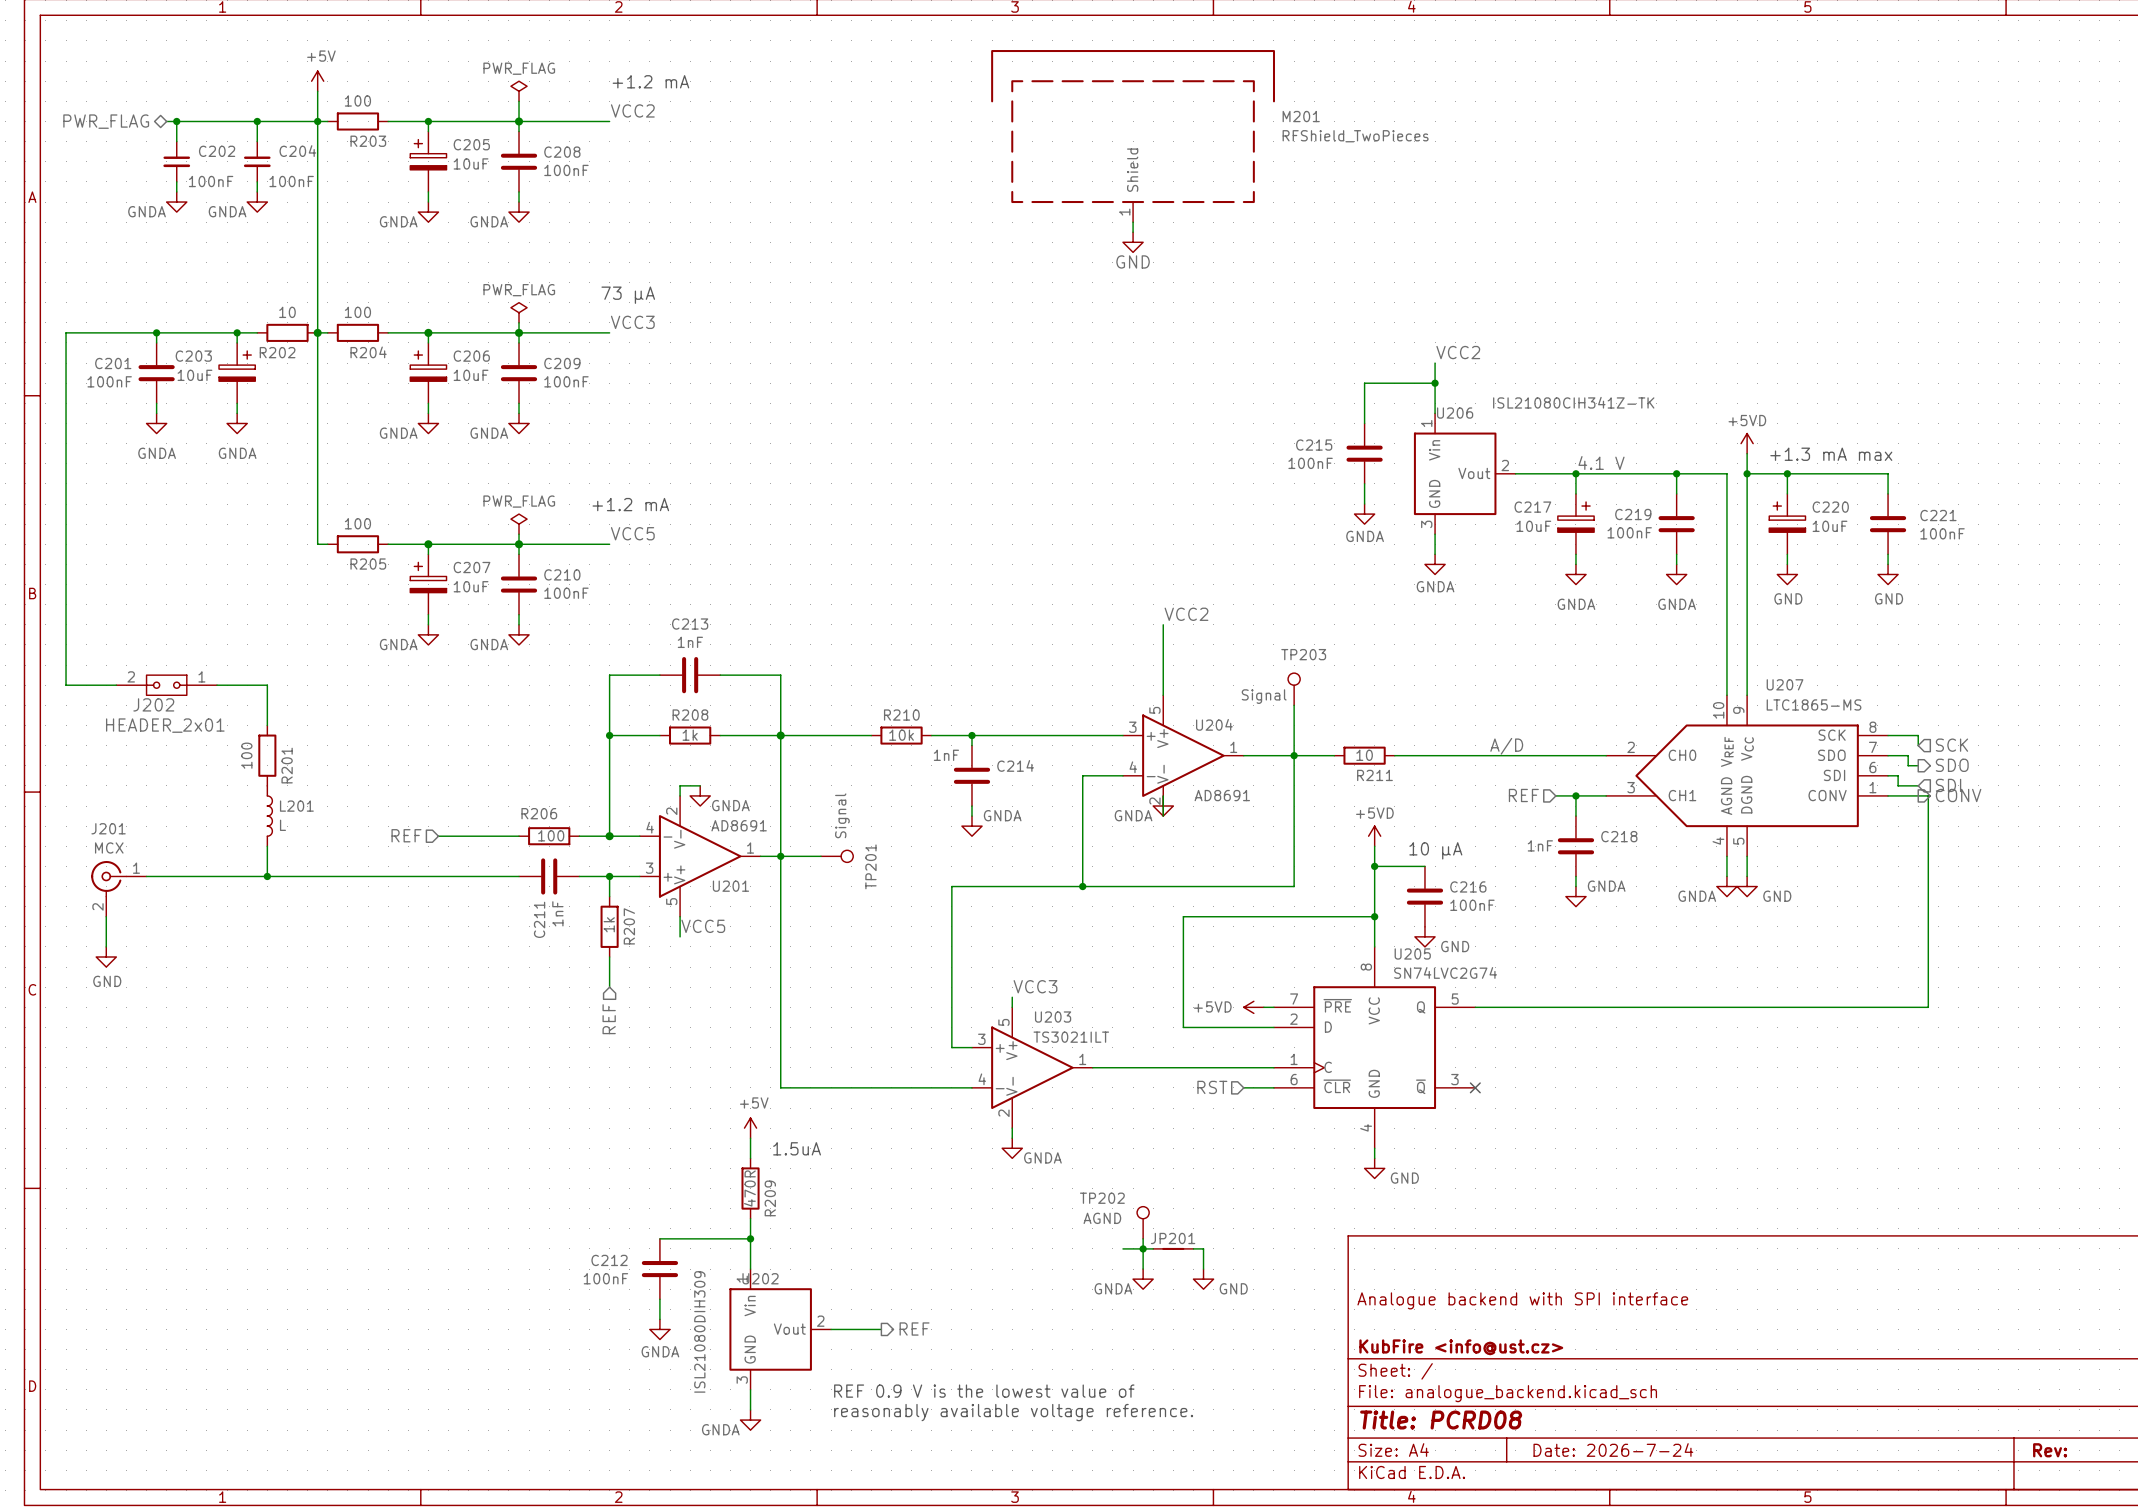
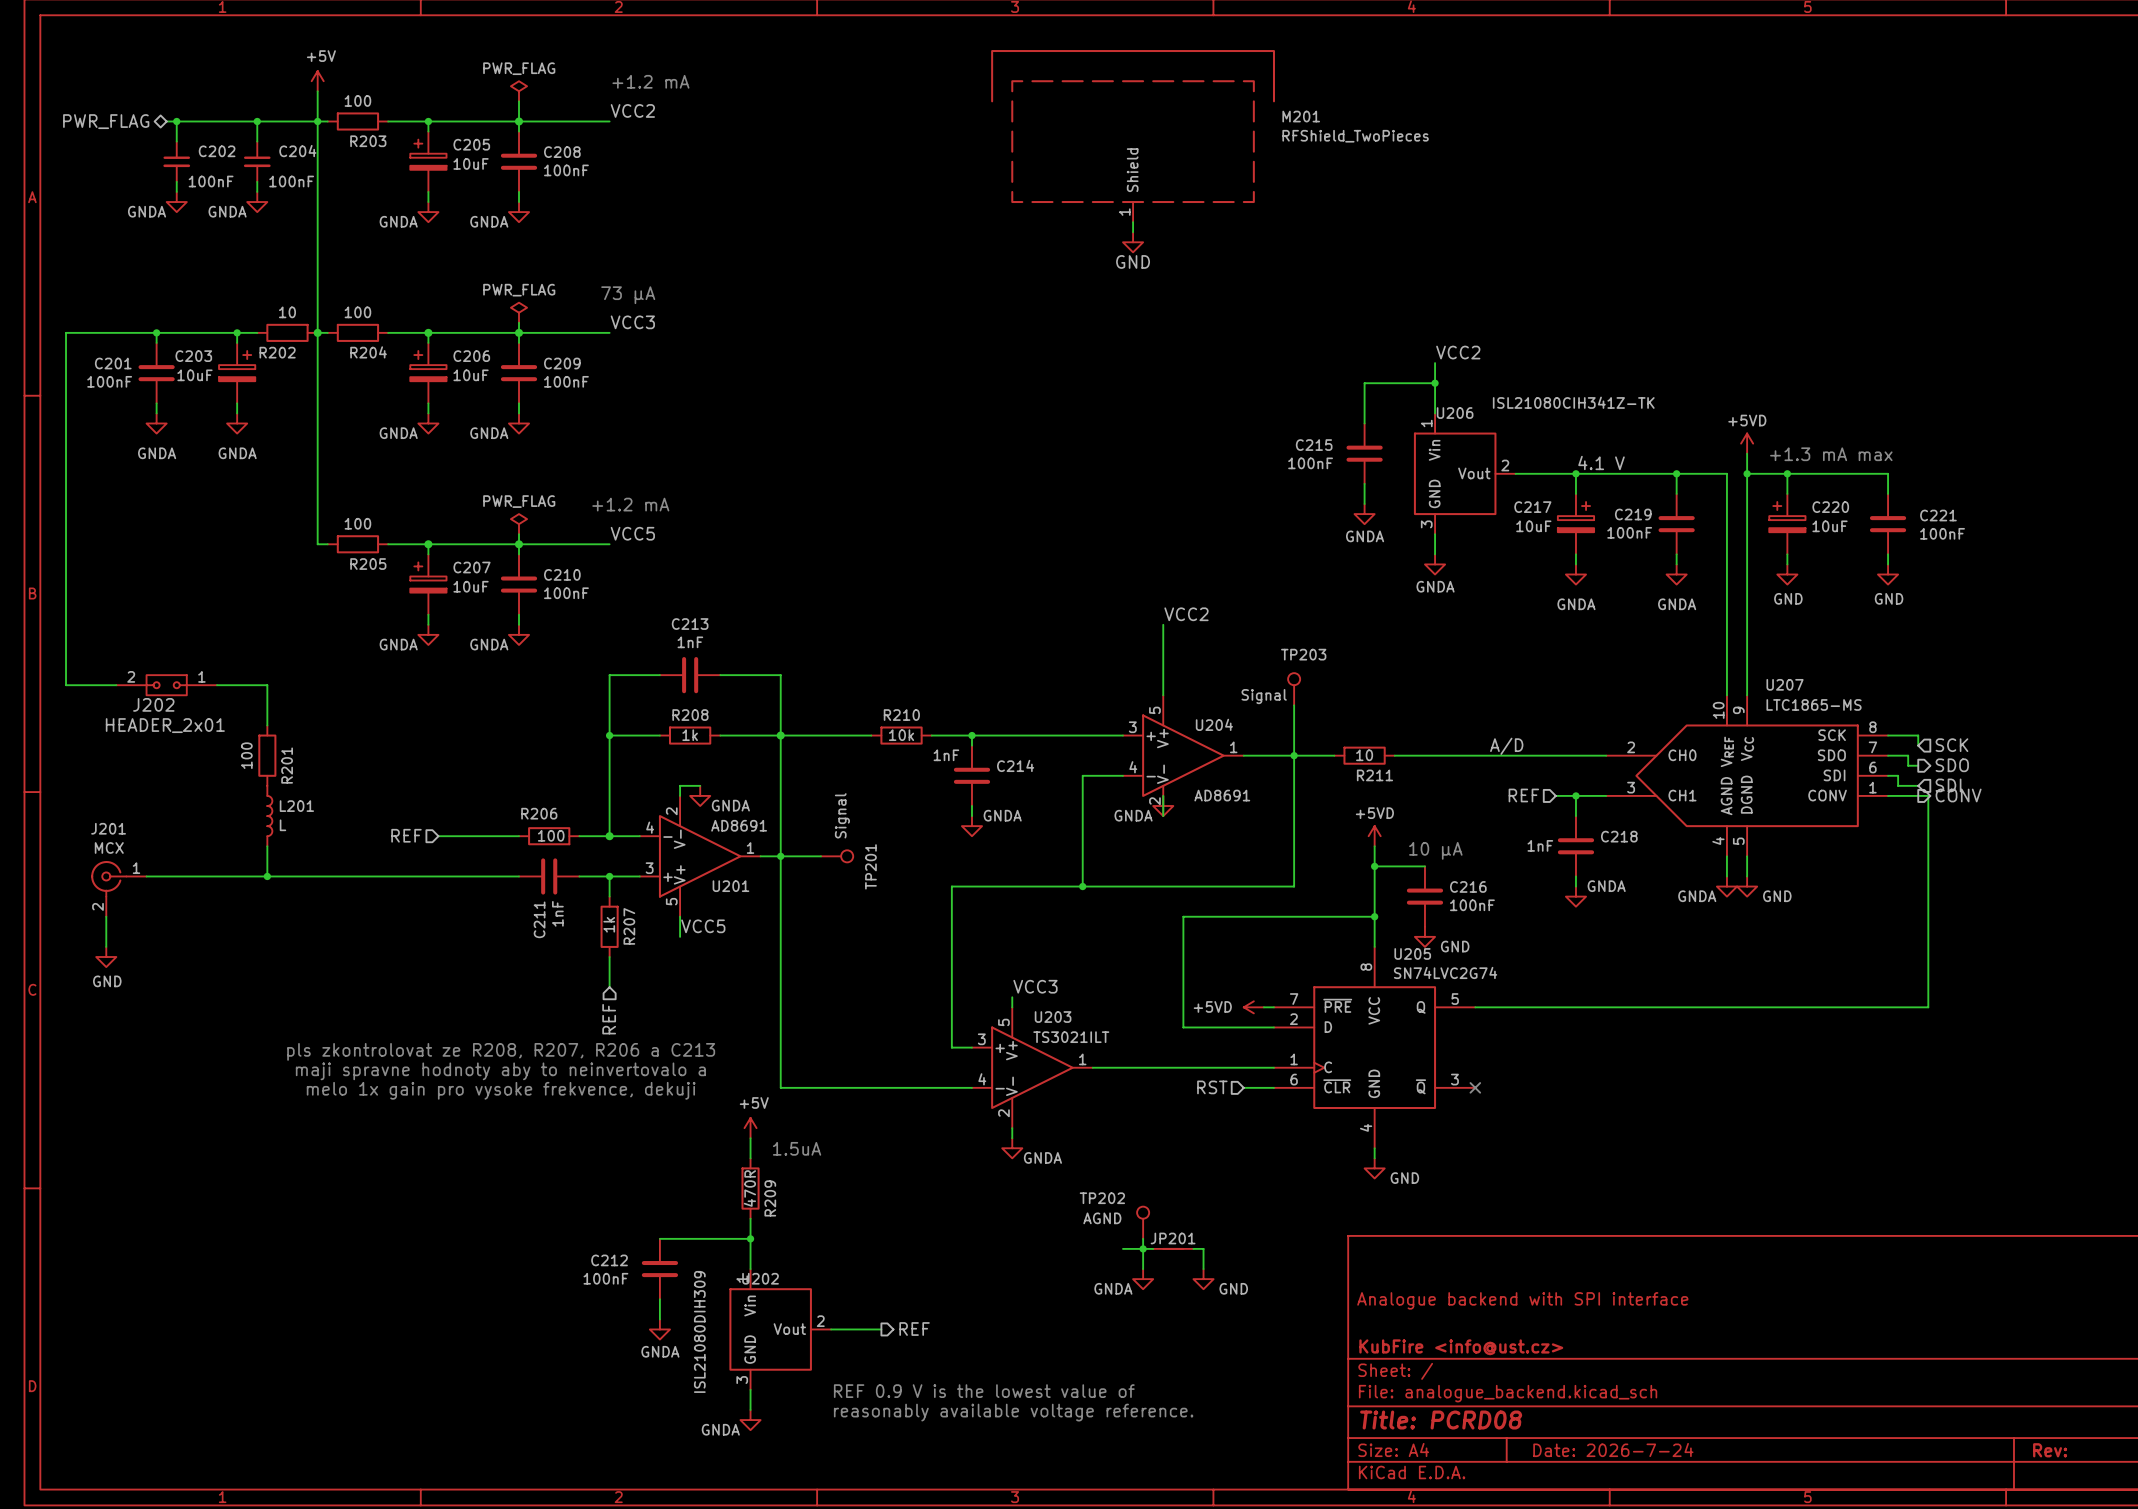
text: none -> pls zkontrolovat ze R208, R207, R206 a C213 (501, 1051)
text: none -> maji spravne hodnoty aby to neinvertovalo a (500, 1071)
text: none -> melo 1x gain pro vysoke frekvence, dekuji (501, 1090)

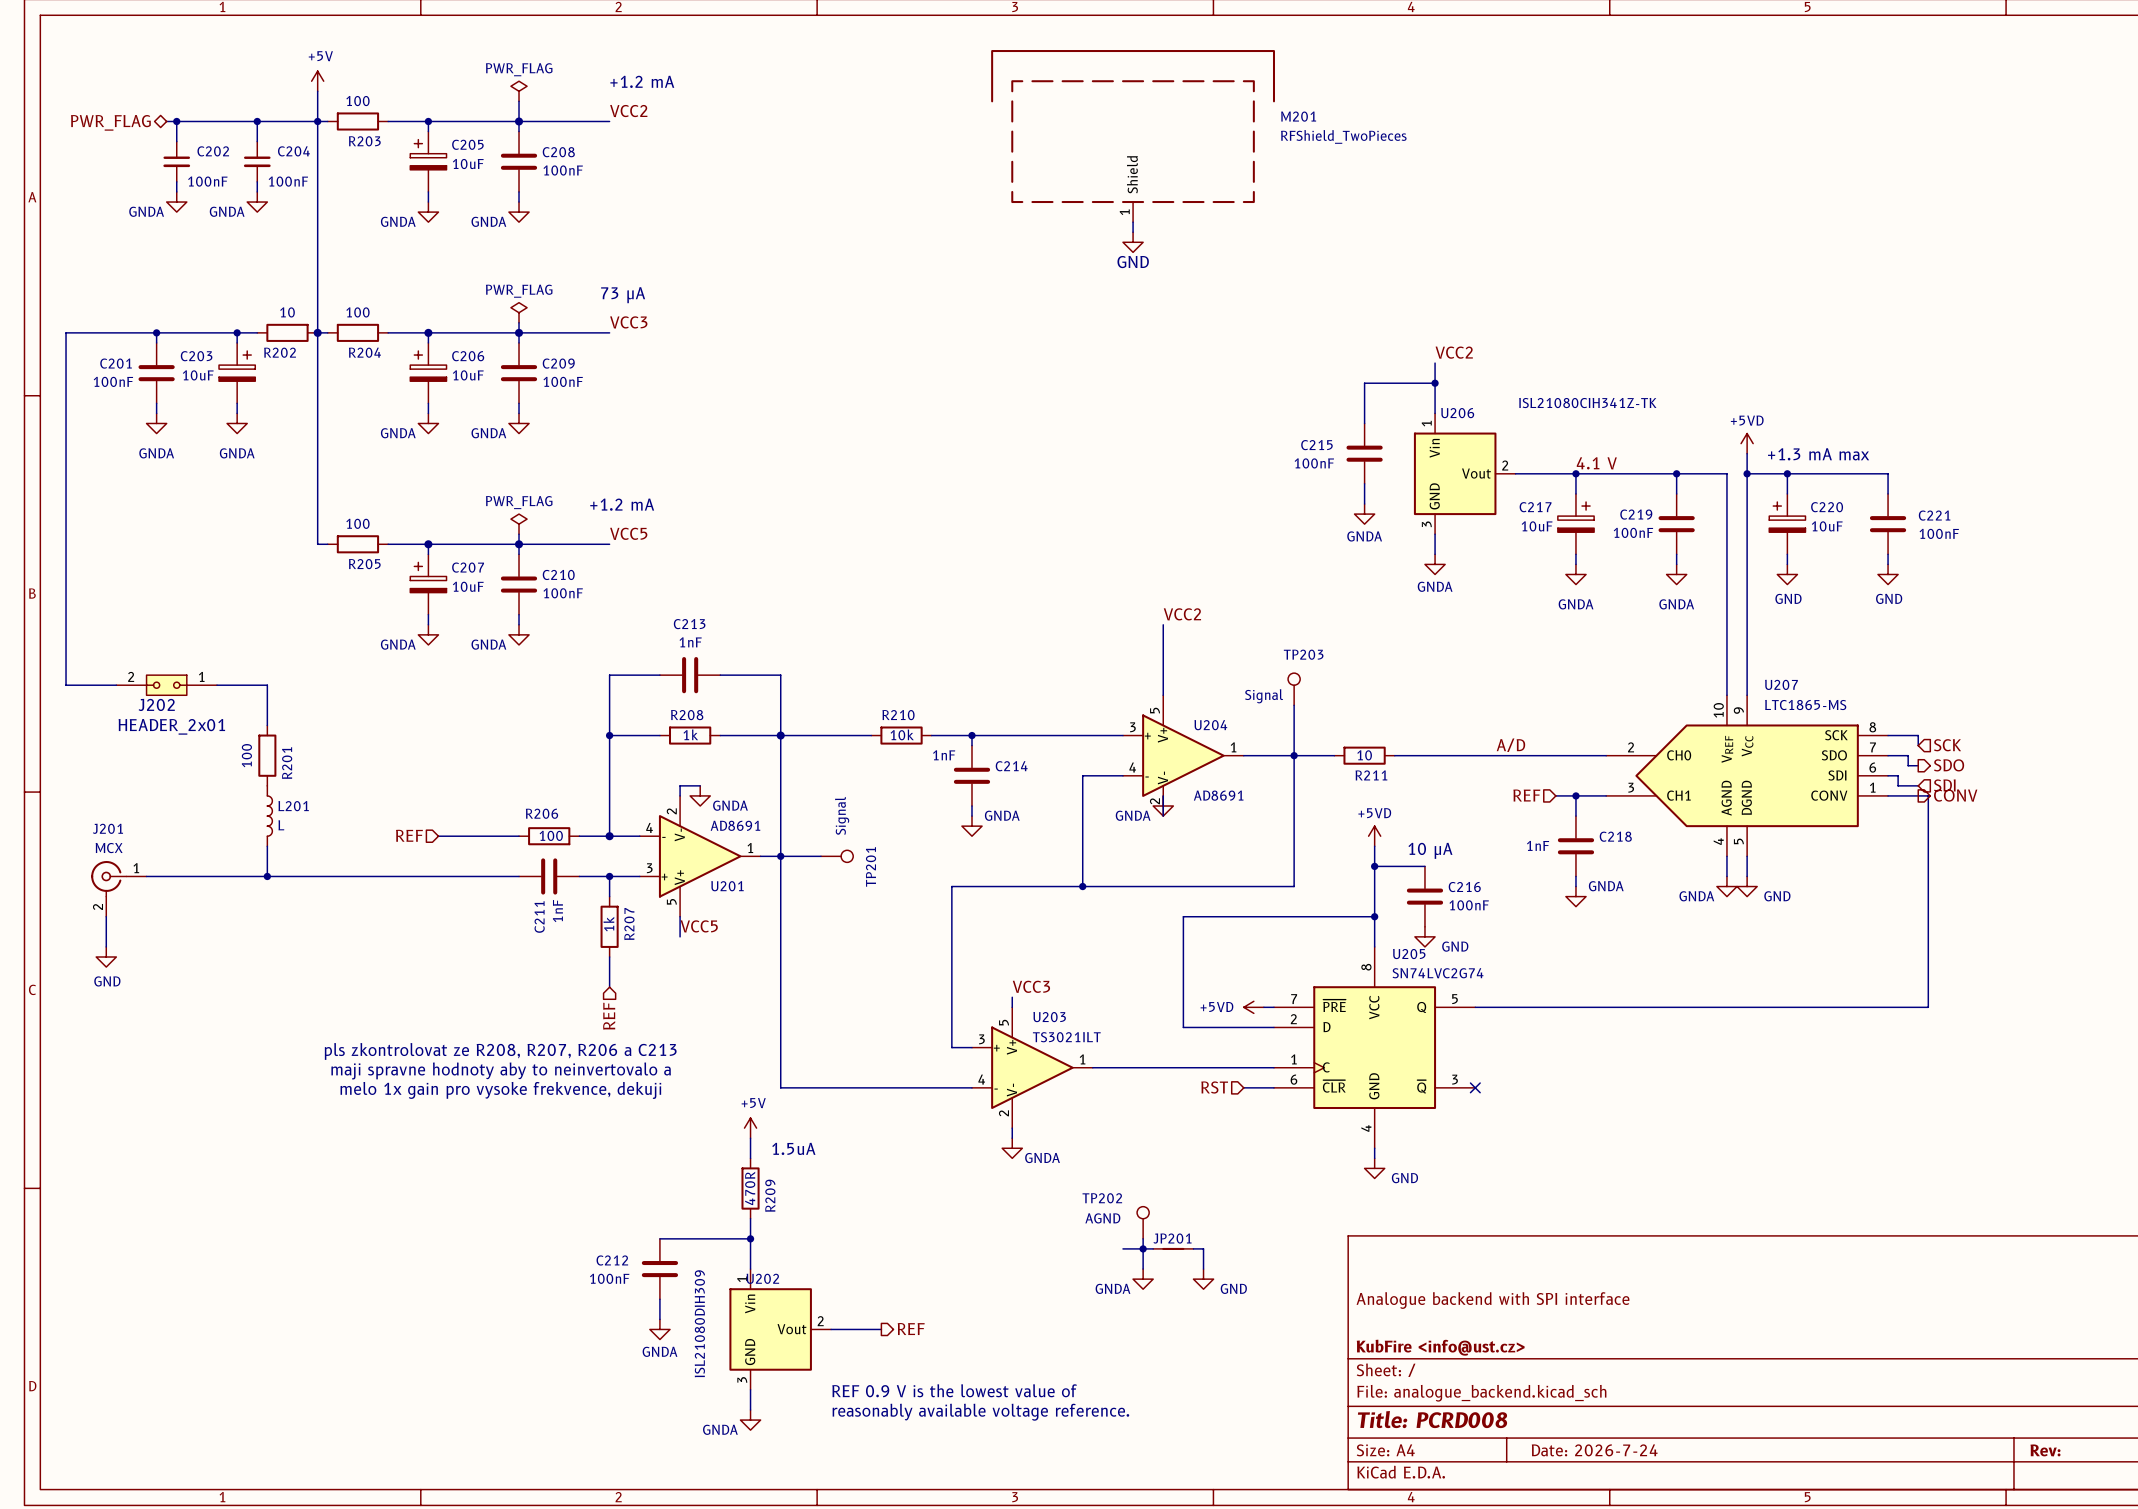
title block: Title: PCRD08 (1441, 1420) -> Title: PCRD008 (1432, 1419)

